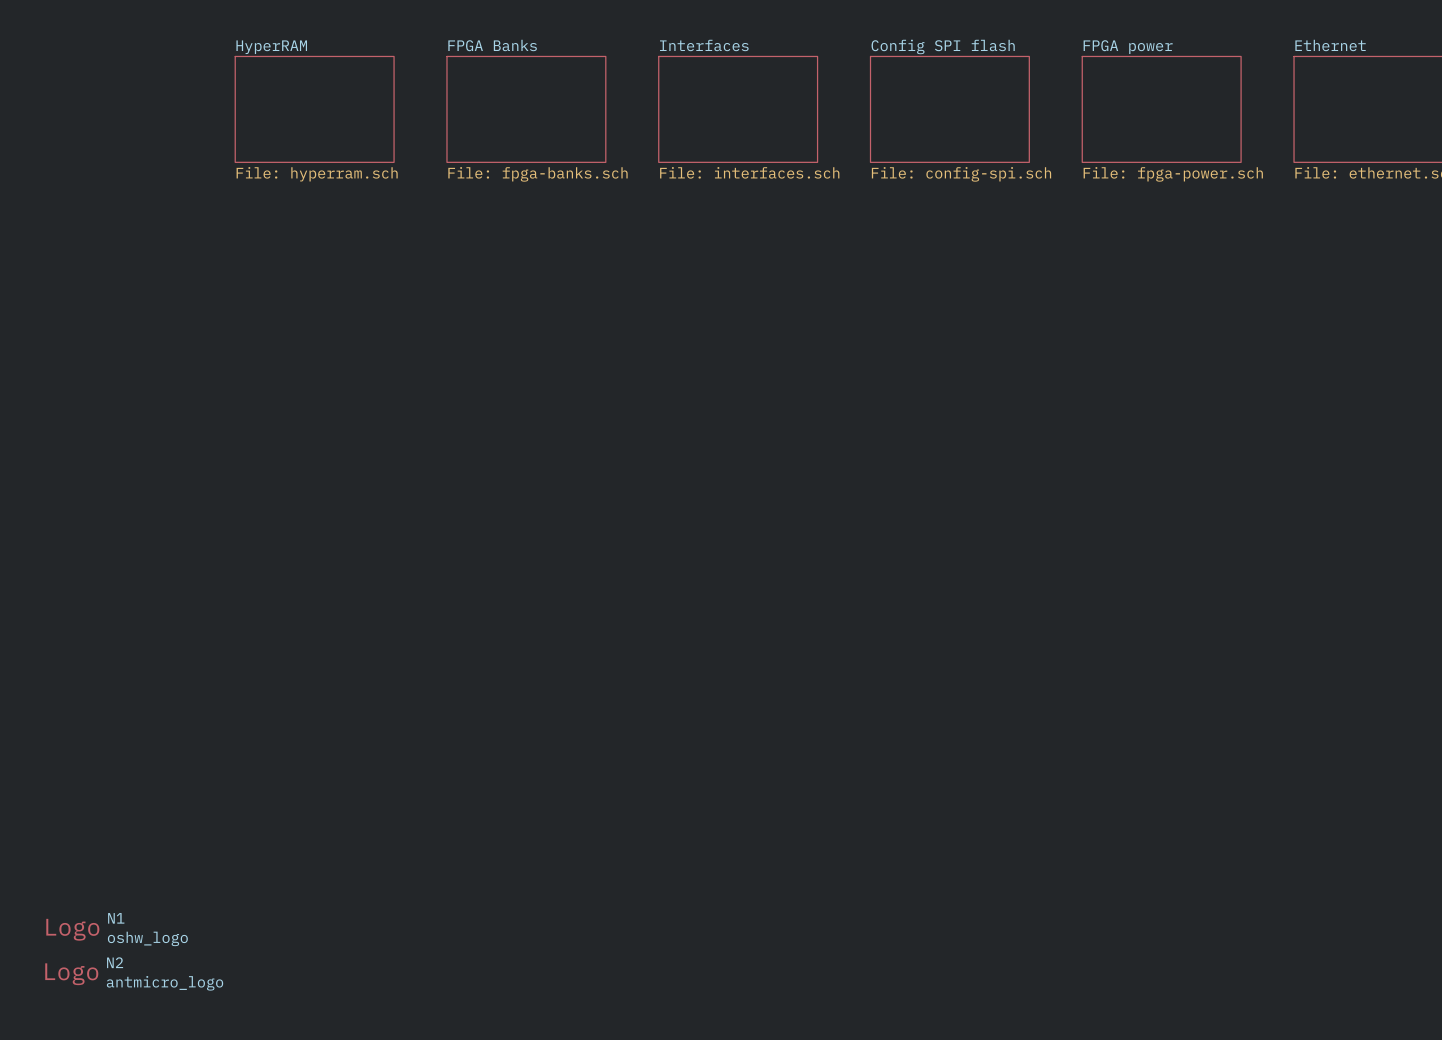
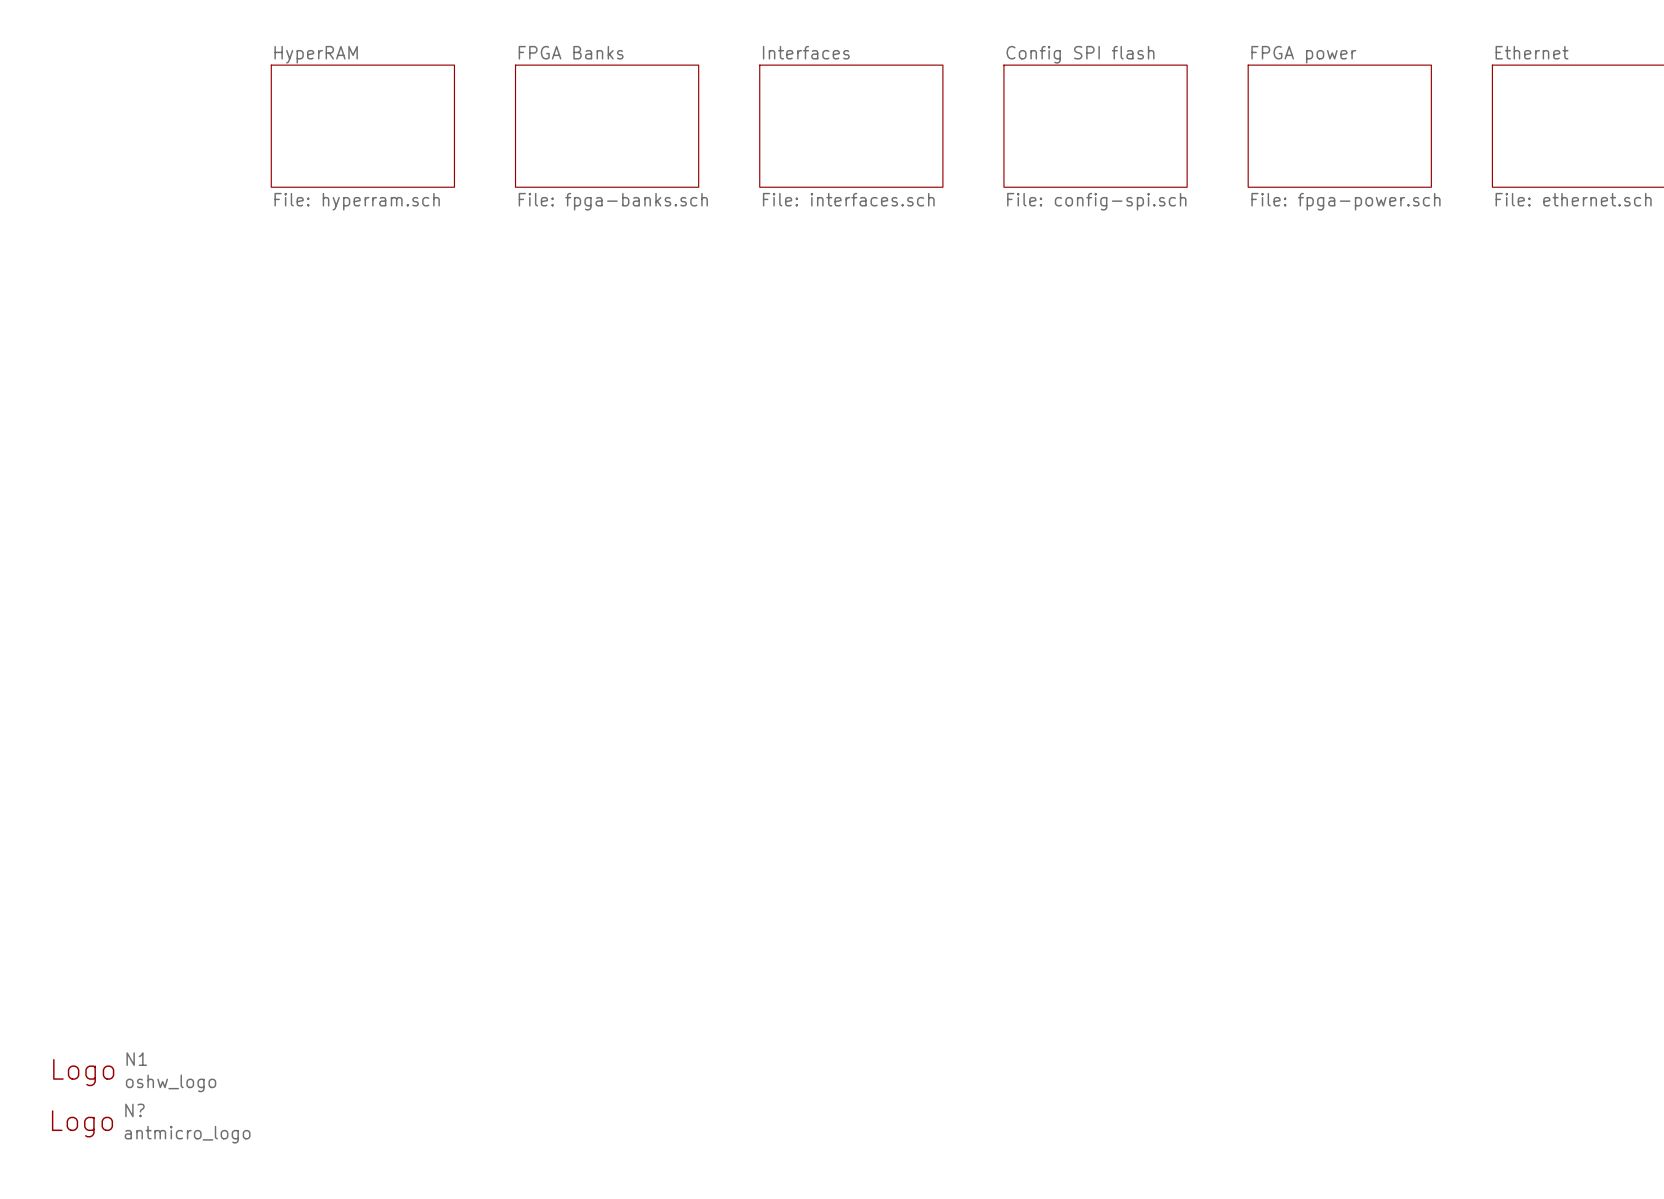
N2 name: N2 (115, 962) -> N? (134, 1110)

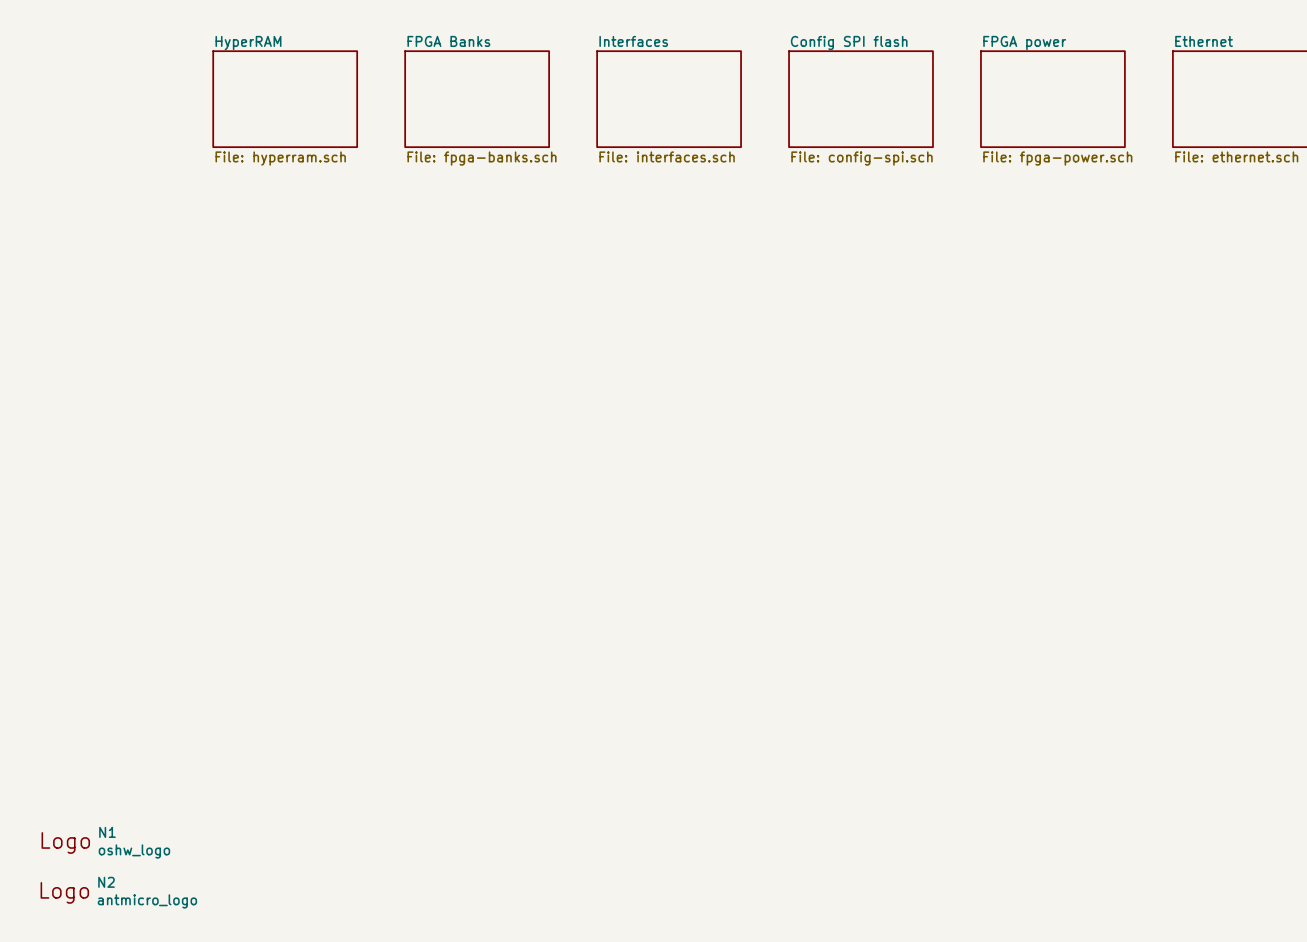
N?: antmicro_logo (151, 1123) -> none
N2: none -> antmicro_logo (118, 892)

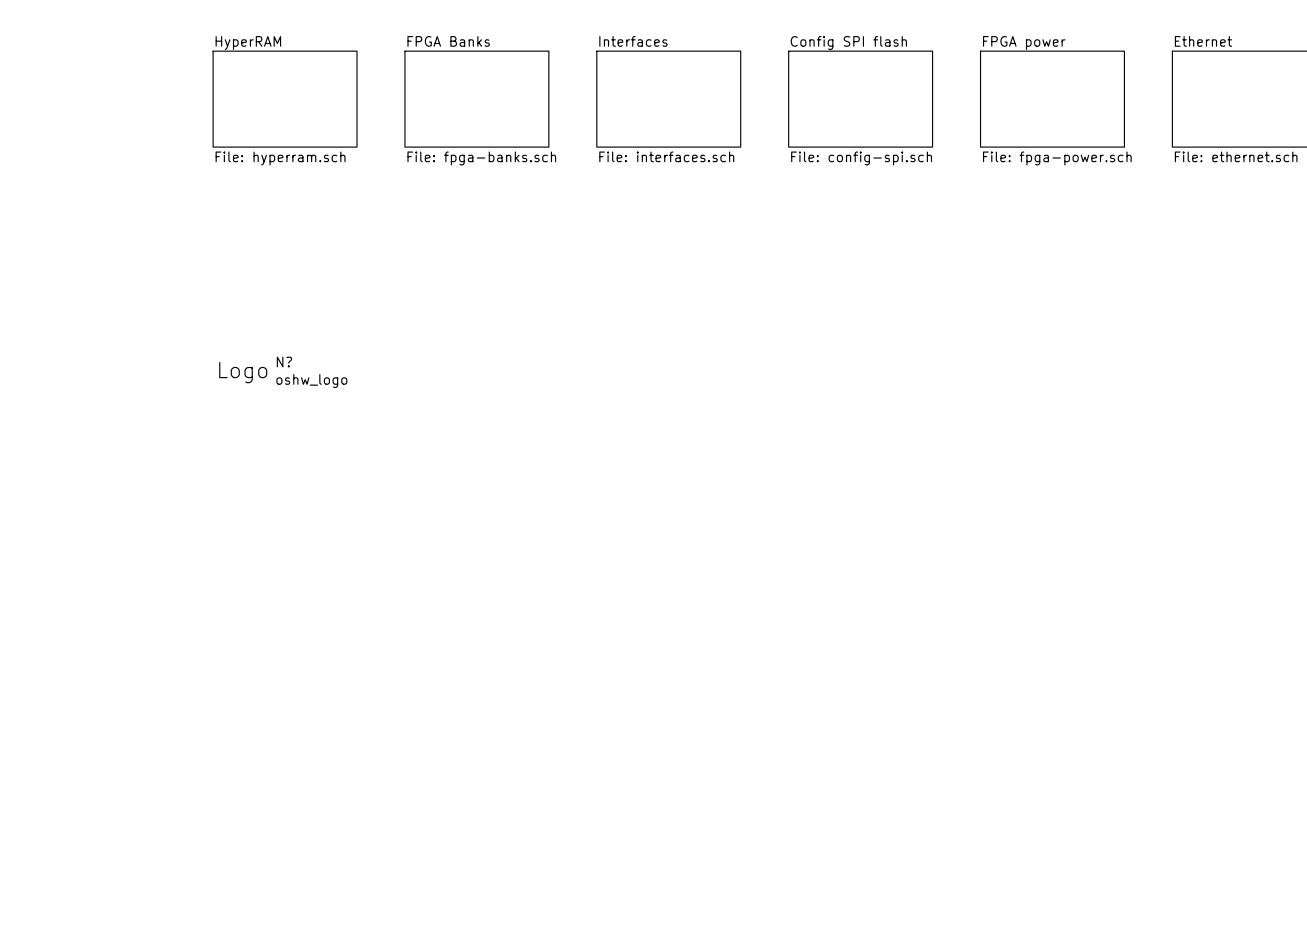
N?: none -> oshw_logo (283, 372)
N1: oshw_logo (105, 842) -> none
N2: antmicro_logo (118, 892) -> none

